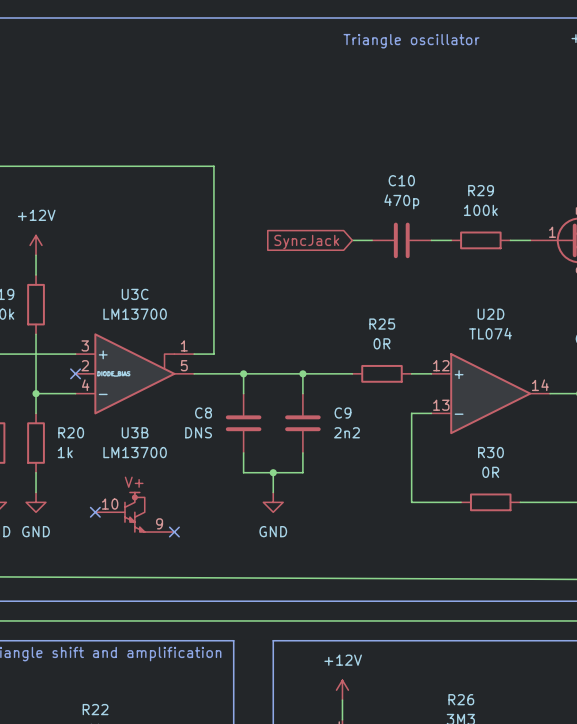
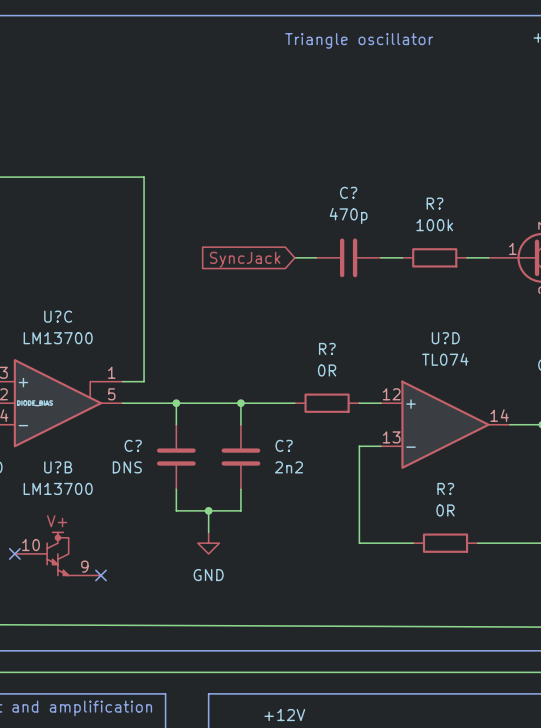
C10 name: C10 (401, 180) -> C? (348, 192)
R29 name: R29 (481, 190) -> R? (435, 203)
U3C name: U3C (135, 294) -> U?C (58, 316)
U2D name: U2D (490, 314) -> U?D (445, 338)
R25 name: R25 (382, 324) -> R? (327, 348)
C8 name: C8 (203, 413) -> C? (133, 445)
C9 name: C9 (343, 413) -> C? (284, 445)
U3B name: U3B (135, 432) -> U?B (58, 467)
R30 name: R30 (490, 452) -> R? (445, 488)

